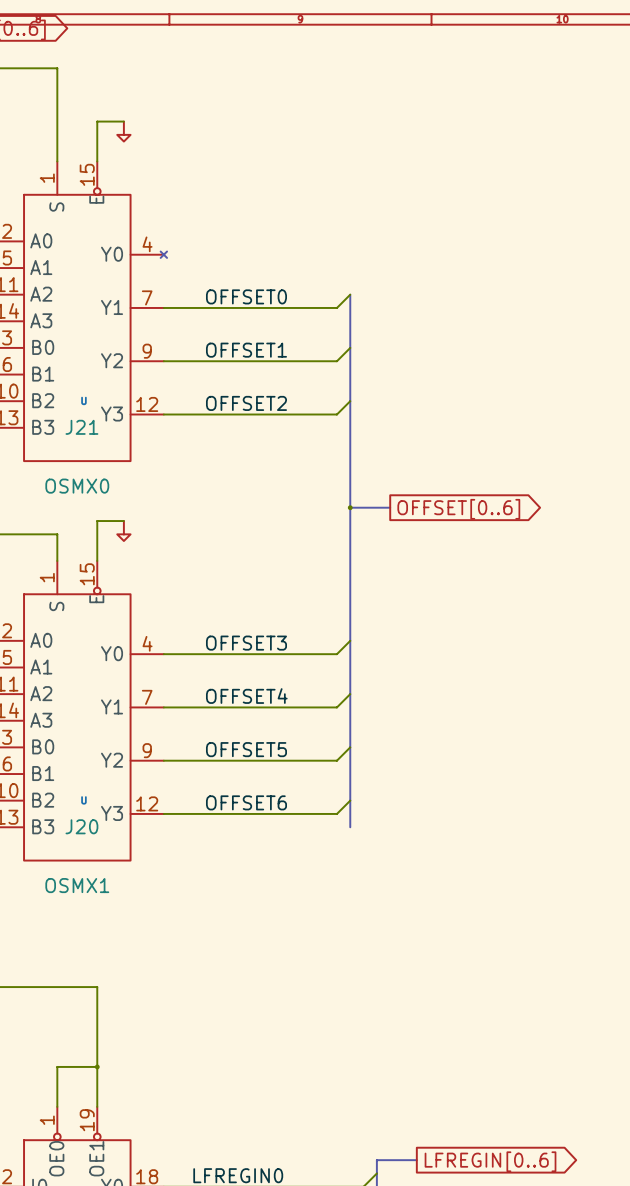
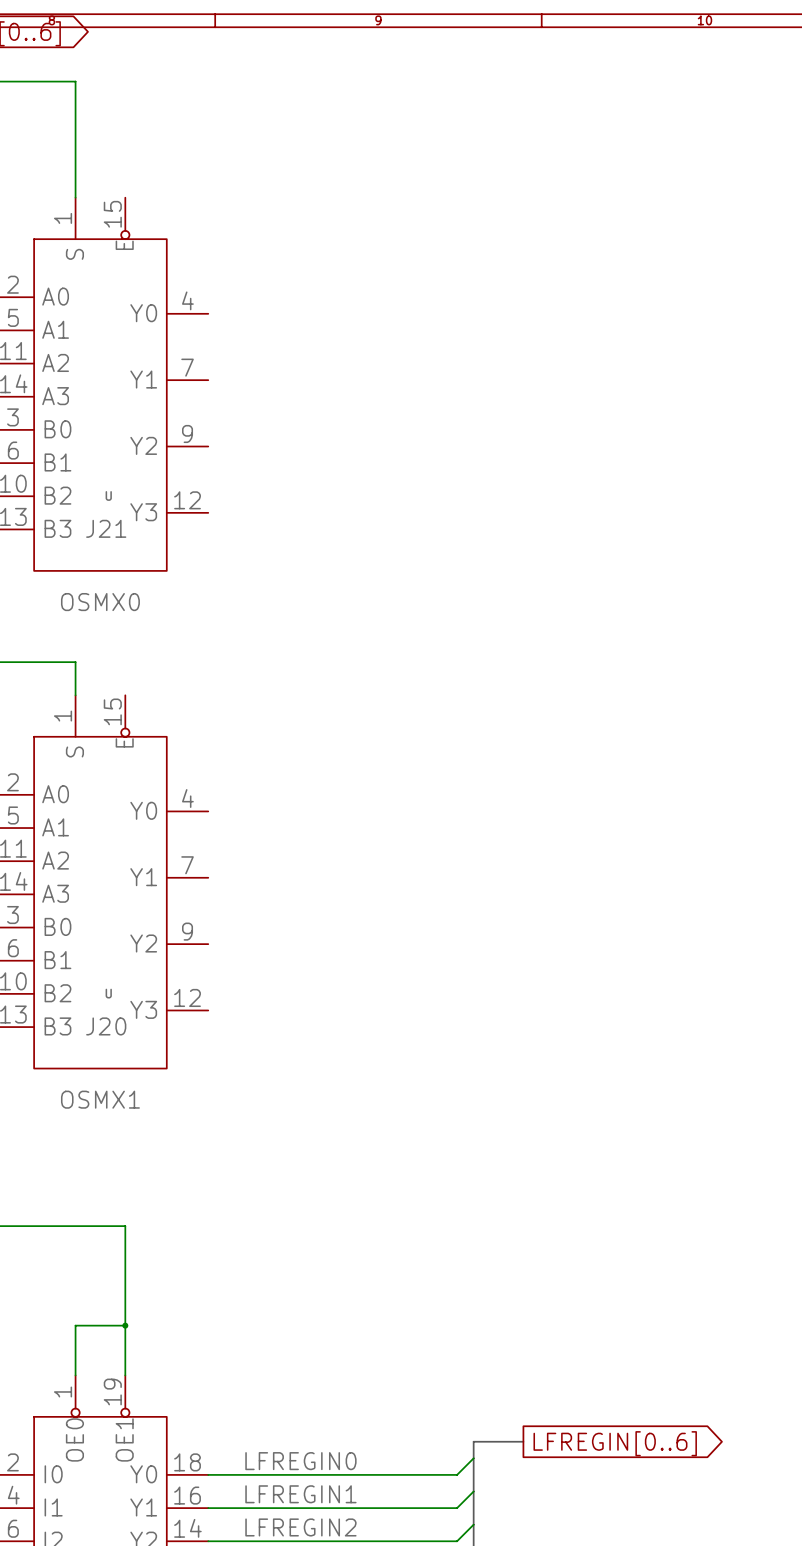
wire: (123, 121) (97, 121) (97, 161) -> none
power symbol: (123, 131) -> none
no-connect mark: (163, 254) -> none
wire: (350, 294) (336, 307) (163, 307) -> none
bus: (350, 294) (350, 827) -> none
label: OFFSET0 (246, 296) -> none
wire: (350, 347) (336, 361) (163, 361) -> none
label: OFFSET1 (246, 350) -> none
wire: (350, 401) (336, 414) (163, 414) -> none
label: OFFSET2 (246, 403) -> none
bus: (350, 507) (390, 507) -> none
junction: (350, 507) -> none
global label: OFFSET[0..6] (458, 509) -> none
wire: (123, 521) (97, 521) (97, 560) -> none
power symbol: (123, 531) -> none
wire: (350, 640) (336, 654) (163, 654) -> none
label: OFFSET3 (246, 643) -> none
wire: (350, 694) (336, 707) (163, 707) -> none
label: OFFSET4 (246, 696) -> none
wire: (350, 747) (336, 760) (163, 760) -> none
label: OFFSET5 (246, 749) -> none
wire: (350, 800) (336, 813) (163, 813) -> none
label: OFFSET6 (246, 802) -> none

